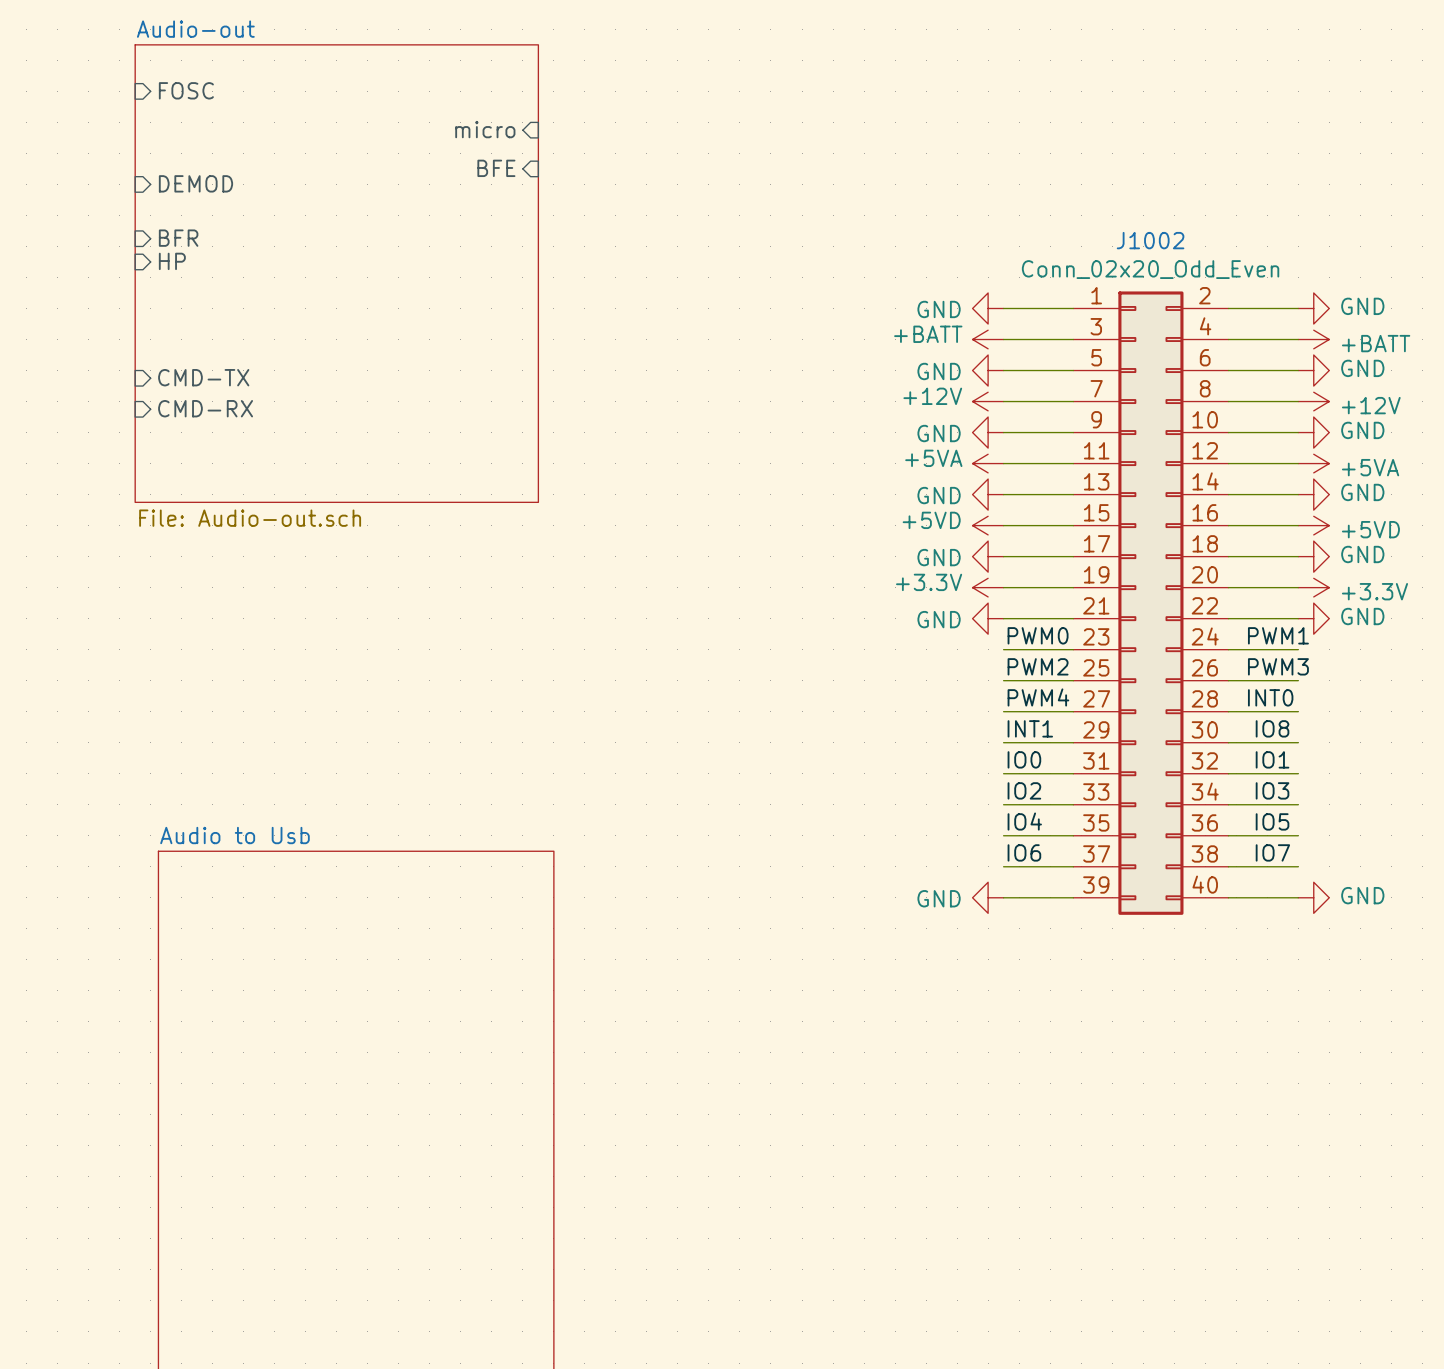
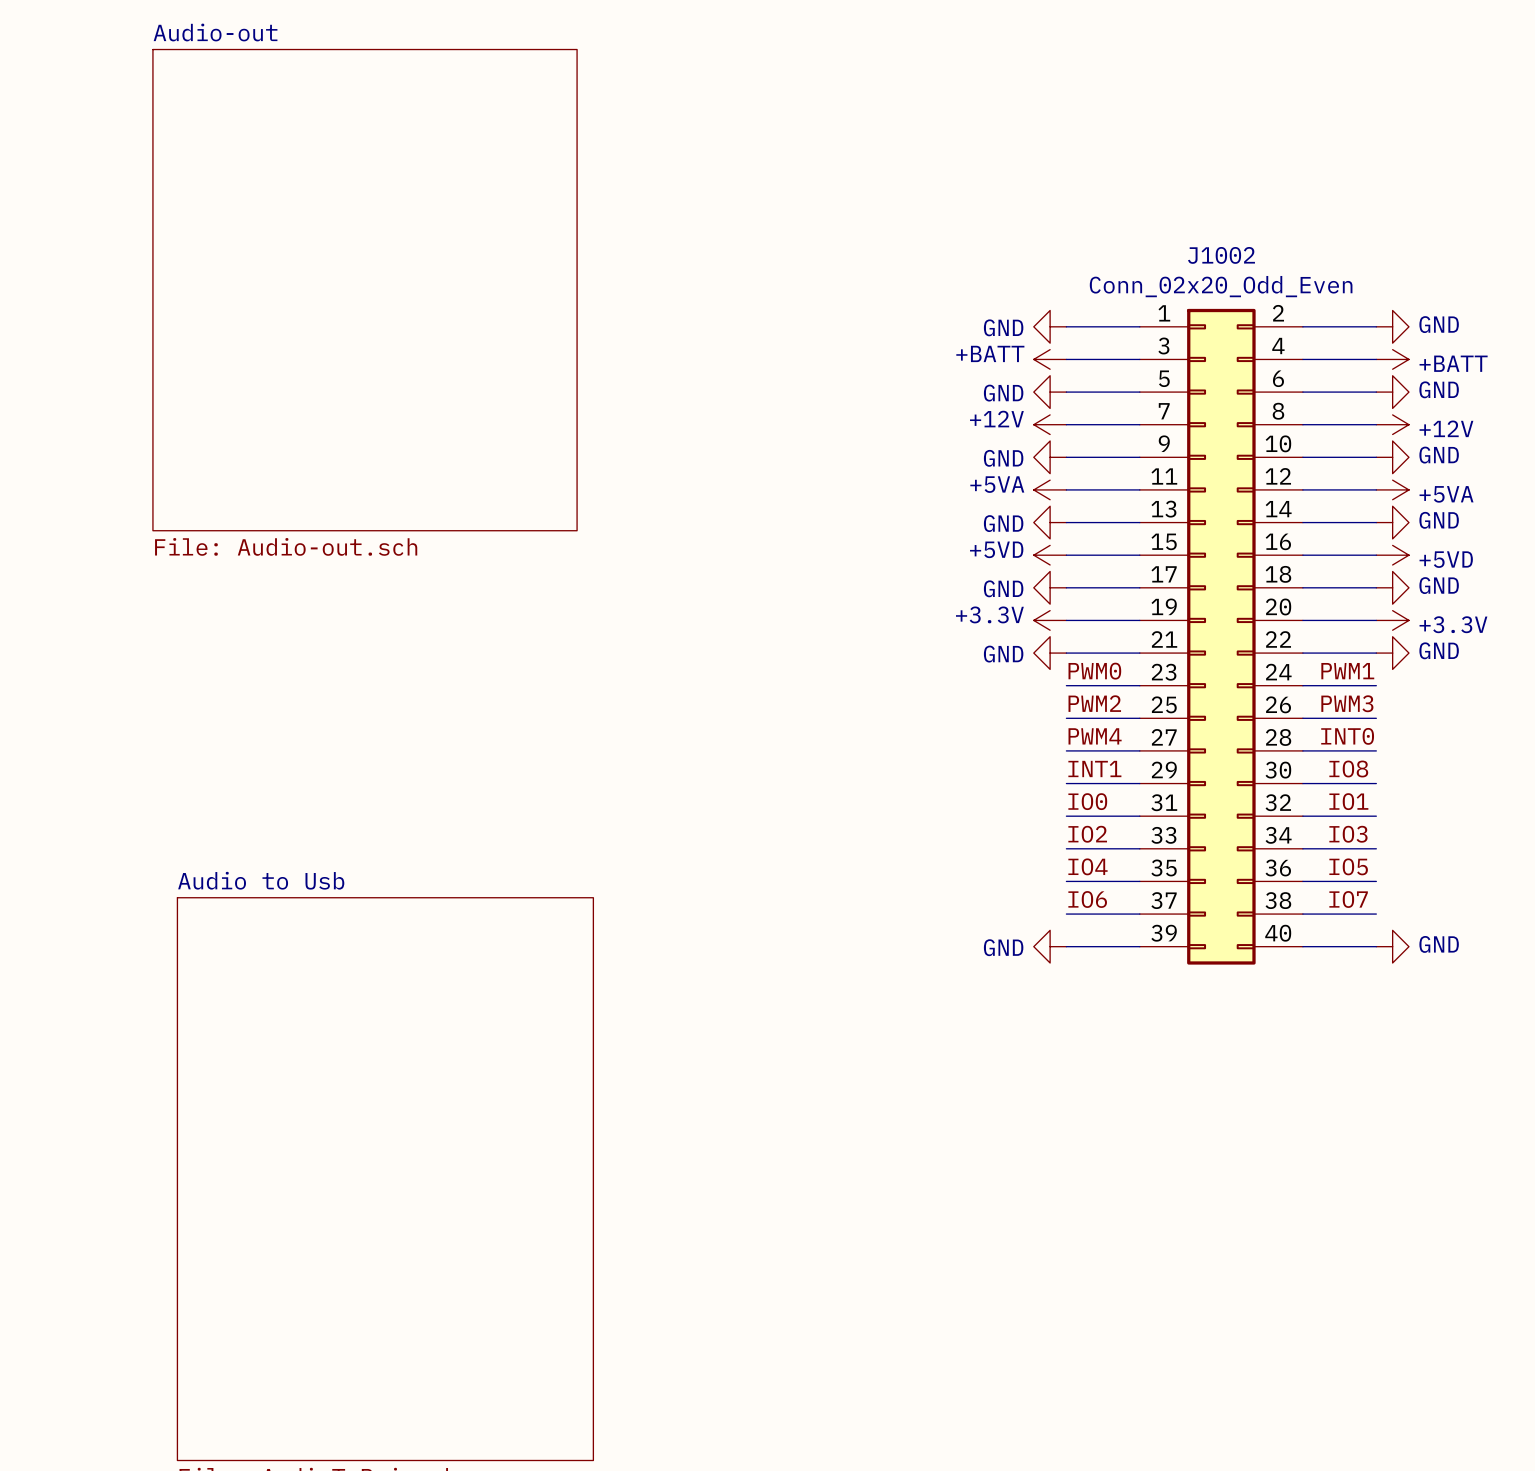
sheet pin: FOSC (186, 90) -> none
sheet pin: micro (485, 129) -> none
sheet pin: BFE (496, 168) -> none
sheet pin: DEMOD (195, 183) -> none
sheet pin: BFR (178, 238) -> none
sheet pin: HP (172, 261) -> none
sheet pin: CMD-TX (203, 377) -> none
sheet pin: CMD-RX (205, 408) -> none

